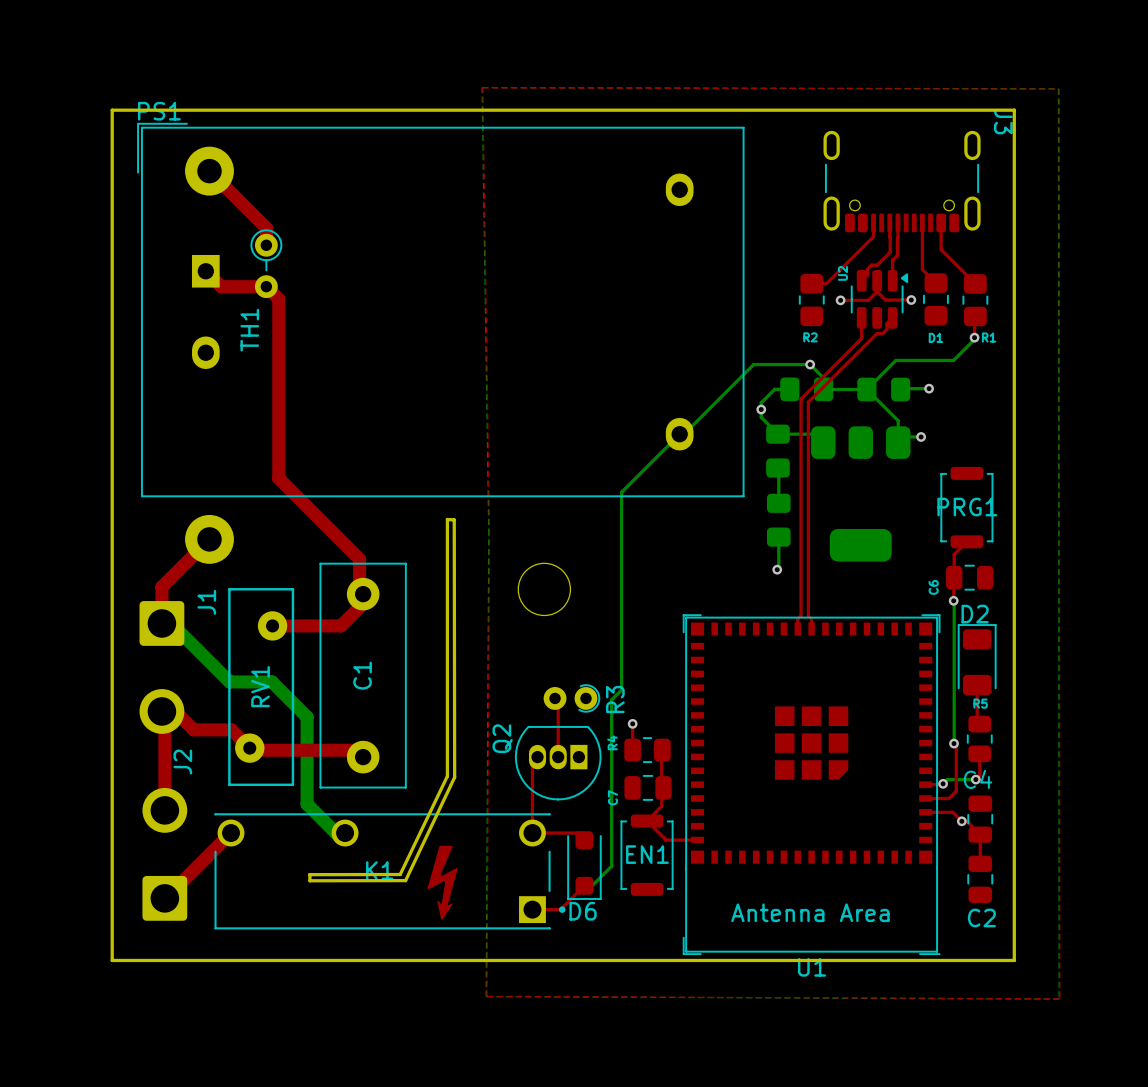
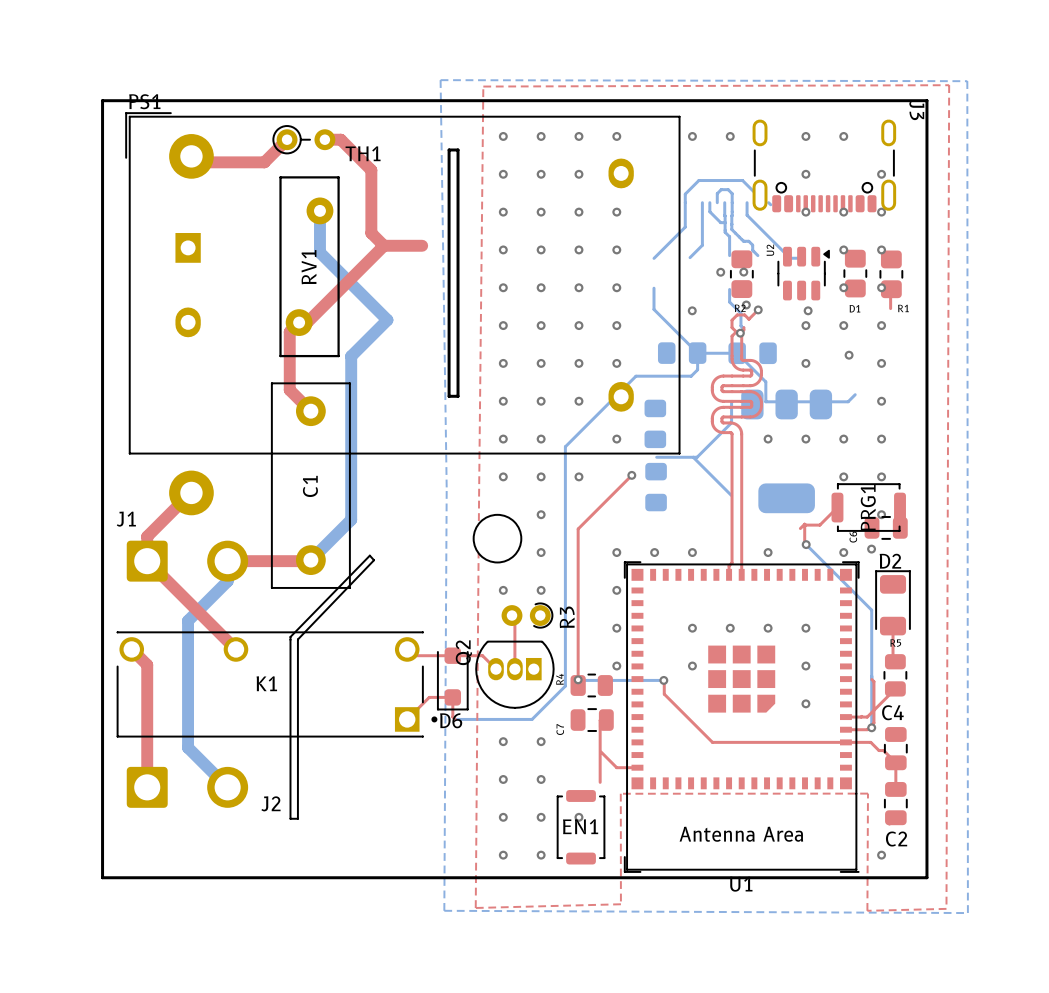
top zone outline: (482, 87) (489, 534) (486, 996) (1059, 998) (1059, 89) (482, 87) -> (949, 85) (483, 86) (475, 907) (620, 904) (620, 793) (867, 793) (867, 910) (946, 908) (949, 85)
via: none -> (503, 136)
via: none -> (541, 136)
via: none -> (578, 136)
via: none -> (616, 136)
via: none -> (692, 136)
via: none -> (730, 136)
via: none -> (805, 136)
via: none -> (843, 136)
top track: none -> (287, 139) (264, 162) (184, 162)
top track: none -> (324, 139) (340, 139) (371, 170) (371, 233) (383, 245)
board edge: none -> (449, 149) (458, 149) (458, 396) (449, 396) (449, 149)
top track: (209, 171) (266, 228) (266, 245) -> none
via: none -> (503, 174)
via: none -> (541, 174)
via: none -> (578, 174)
via: none -> (805, 174)
via: none -> (881, 174)
bottom track: none -> (702, 202) (702, 245) (690, 257)
bottom track: none -> (709, 202) (709, 211) (720, 222) (725, 222)
bottom track: none -> (717, 202) (717, 193) (721, 189) (728, 189) (732, 193) (731, 229) (743, 241) (748, 241) (752, 245) (752, 250) (757, 255)
bottom track: none -> (724, 202) (725, 232) (729, 236) (729, 255)
bottom track: none -> (747, 202) (747, 215) (790, 258) (803, 258)
bottom track: none -> (756, 202) (756, 194) (742, 180) (698, 180) (685, 194) (685, 227) (654, 258)
bottom track: none -> (768, 202) (770, 204)
top track: (873, 222) (873, 236) (826, 283) (811, 283) -> none
top track: (889, 222) (890, 252) (877, 265) (871, 265) (867, 269) (867, 275) (861, 280) -> none
top track: (897, 222) (897, 255) (892, 260) (892, 280) -> none
top track: (922, 222) (922, 269) (935, 283) -> none
top track: (941, 222) (941, 249) (975, 283) -> none
bottom track: none -> (319, 210) (319, 252) (387, 320) (351, 356) (351, 519) (310, 560)
via: none -> (503, 212)
via: none -> (541, 212)
via: none -> (578, 212)
via: none -> (616, 212)
via: none -> (805, 212)
via: none -> (843, 212)
via: none -> (881, 212)
TH1 rotation: 0° (266, 263) -> 90° counterclockwise (303, 139)
TH1 position: (266, 263) -> (303, 139)
top track: none -> (383, 245) (422, 245)
top track: none -> (383, 245) (307, 322) (299, 322) (289, 331) (289, 390) (310, 411)
top track: (205, 271) (221, 286) (266, 286) (278, 299) (278, 478) (359, 559) (359, 590) (363, 594) -> none
via: none -> (503, 249)
via: none -> (541, 249)
via: none -> (578, 249)
via: none -> (616, 249)
via: none -> (843, 249)
via: none -> (881, 249)
top track: (877, 291) (885, 300) (911, 300) -> none
top track: (877, 291) (868, 300) (840, 300) -> none
via: none -> (720, 272)
via: none -> (743, 272)
via: (840, 300) -> none
via: (911, 300) -> none
via: none -> (503, 287)
via: none -> (541, 287)
via: none -> (578, 287)
via: none -> (616, 287)
via: none -> (843, 287)
via: none -> (881, 287)
bottom track: none -> (654, 288) (654, 309) (697, 353) (737, 353) (765, 381) (765, 401) (848, 401) (855, 394)
bottom track: none -> (729, 289) (729, 302) (740, 313) (740, 325) (743, 327)
top track: (861, 317) (861, 338) (801, 399) (801, 475) -> (758, 309) (748, 319) (744, 314) (737, 314) (732, 320) (732, 327) (735, 331) (732, 336) (732, 363) (738, 369) (751, 370) (751, 375) (720, 376) (712, 384) (713, 394) (719, 400) (751, 402) (750, 407) (722, 407) (713, 412) (712, 421) (714, 428) (720, 432) (732, 434)
top track: (892, 317) (886, 323) (886, 329) (882, 333) (876, 333) (808, 402) (808, 615) (811, 619) -> (743, 327) (741, 332) (741, 359) (753, 360) (758, 363) (761, 370) (760, 378) (753, 385) (721, 387) (723, 391) (754, 392) (761, 401) (760, 410) (754, 416) (721, 418) (722, 422) (737, 425) (741, 432) (741, 565)
via: none -> (746, 305)
bottom track: (974, 337) (953, 360) (895, 360) (866, 389) -> none
via: (974, 337) -> none
via: none -> (758, 309)
via: none -> (692, 310)
via: none -> (808, 310)
via: none -> (503, 325)
via: none -> (541, 325)
via: none -> (578, 325)
via: none -> (616, 325)
via: none -> (805, 325)
via: none -> (843, 325)
via: none -> (881, 325)
part: none -> (682, 353)
bottom track: none -> (697, 353) (697, 369) (691, 376) (635, 376) (565, 446) (565, 686) (532, 719) (455, 719)
bottom track: (789, 388) (774, 389) (761, 402) (761, 417) (777, 434) (814, 434) (823, 442) -> none
bottom track: (929, 388) (900, 389) -> none
part position: (806, 389) -> (752, 353)
bottom track: (823, 389) (823, 378) (810, 364) (753, 364) (684, 434) (679, 434) (621, 492) (621, 689) (611, 699) (611, 866) (592, 885) (584, 885) -> none
bottom track: (823, 389) (866, 389) -> none
bottom track: (866, 389) (898, 420) (898, 442) (903, 436) (921, 436) -> none
part: (883, 389) -> none
via: none -> (503, 363)
via: none -> (541, 363)
via: none -> (578, 363)
via: none -> (616, 363)
via: none -> (805, 363)
via: none -> (881, 363)
via: (761, 409) -> none
via: (921, 436) -> none
via: none -> (503, 401)
via: none -> (541, 401)
via: none -> (578, 401)
bottom track: none -> (731, 401) (731, 422) (697, 457) (656, 457)
via: none -> (881, 401)
part: (777, 451) -> none
part: none -> (655, 423)
bottom track: (777, 467) (778, 503) -> none
via: none -> (503, 439)
via: none -> (541, 439)
via: none -> (616, 439)
via: none -> (768, 439)
via: none -> (805, 439)
via: none -> (843, 439)
via: none -> (881, 439)
bottom track: none -> (693, 457) (731, 495)
PRG1 rotation: 0° (966, 507) -> 90° clockwise (868, 507)
PRG1 position: (966, 507) -> (868, 507)
board edge: (447, 519) (454, 519) (454, 777) (405, 880) (309, 880) (309, 874) (400, 874) (447, 776) (447, 519) -> none
top track: none -> (631, 475) (578, 529) (578, 661)
via: none -> (631, 475)
part: (778, 520) -> none
via: none -> (503, 476)
via: none -> (541, 476)
via: none -> (578, 476)
via: none -> (843, 476)
via: none -> (881, 476)
part: none -> (656, 487)
top track: (209, 539) (161, 586) (161, 623) -> none
bottom track: (782, 541) (778, 537) (778, 568) (777, 569) -> none
top track: (966, 541) (954, 554) (953, 600) -> none
top track: none -> (184, 498) (147, 536) (147, 561) (235, 649)
top track: none -> (837, 507) (819, 525) (804, 524)
via: none -> (541, 514)
via: none -> (881, 514)
via: (777, 569) -> none
top track: none -> (804, 524) (806, 544)
top track: none -> (804, 524) (800, 528)
top track: (363, 594) (363, 603) (341, 625) (272, 625) -> none
bottom track: none -> (806, 544) (871, 610) (871, 727)
via: none -> (806, 544)
bottom track: (953, 600) (954, 739) -> none
via: none -> (541, 552)
via: none -> (616, 552)
via: none -> (654, 552)
via: none -> (692, 552)
via: none -> (768, 552)
via: none -> (843, 552)
board edge: none -> (369, 555) (290, 636) (290, 818) (297, 818) (297, 639) (374, 560) (369, 555)
top track: none -> (310, 560) (227, 561)
bottom track: none -> (227, 561) (227, 581) (188, 620) (188, 747) (227, 787)
bottom track: (161, 623) (171, 623) (229, 681) (272, 681) (307, 717) (307, 804) (335, 833) (345, 833) -> none
via: none -> (503, 590)
via: none -> (541, 590)
via: none -> (616, 590)
J1 rotation: 0° (161, 667) -> 90° counterclockwise (187, 561)
C1 position: (363, 675) -> (310, 485)
RV1 position: (261, 687) -> (309, 266)
via: none -> (616, 628)
via: none -> (692, 628)
via: none -> (730, 628)
via: none -> (768, 628)
via: none -> (805, 628)
top track: (555, 698) (558, 701) (558, 757) -> (512, 615) (514, 618) (514, 669)
R3 position: (571, 698) -> (527, 615)
top track: none -> (131, 649) (147, 664) (147, 787)
top track: none -> (407, 649) (413, 655) (482, 655) (495, 669)
top track: (164, 714) (178, 714) (193, 729) (231, 729) (251, 750) (356, 750) (363, 757) -> none
top track: (164, 714) (164, 810) -> none
via position: (632, 723) -> (578, 679)
via: none -> (616, 666)
via: none -> (692, 666)
via: none -> (805, 666)
bottom track: none -> (578, 679) (663, 680)
via: (954, 743) -> none
top track: none -> (663, 680) (664, 694) (712, 742) (845, 742)
via: none -> (663, 680)
top track: (662, 750) (661, 806) (647, 820) (666, 840) (674, 840) -> (601, 752) (616, 767)
top track: (979, 753) (979, 775) (975, 779) -> (895, 688) (867, 717) (861, 717)
top track: (537, 757) (532, 762) (532, 833) (577, 833) (584, 840) -> none
Q2 position: (558, 763) -> (514, 674)
via: none -> (805, 703)
bottom track: (975, 779) (947, 779) (943, 783) -> none
via: (975, 779) -> none
via: (943, 783) -> none
top track: none -> (407, 719) (429, 697) (452, 697) (452, 716) (455, 719)
top track: none -> (600, 720) (600, 782)
via: none -> (871, 727)
via: none -> (503, 741)
via: none -> (541, 741)
via: (961, 821) -> none
top track: (231, 833) (164, 898) -> none
drawing: [427, 845, 458, 920] -> none
via: none -> (503, 779)
via: none -> (541, 779)
J2 rotation: 0° (164, 854) -> 90° clockwise (187, 787)
EN1 position: (647, 855) -> (581, 827)
D6 position: (584, 865) -> (452, 678)
K1 position: (389, 871) -> (277, 684)
top track: (584, 885) (560, 909) (532, 909) -> none
via: none -> (503, 817)
via: none -> (541, 817)
via: none -> (578, 817)
via: none -> (503, 855)
via: none -> (541, 855)
via: none -> (881, 855)

